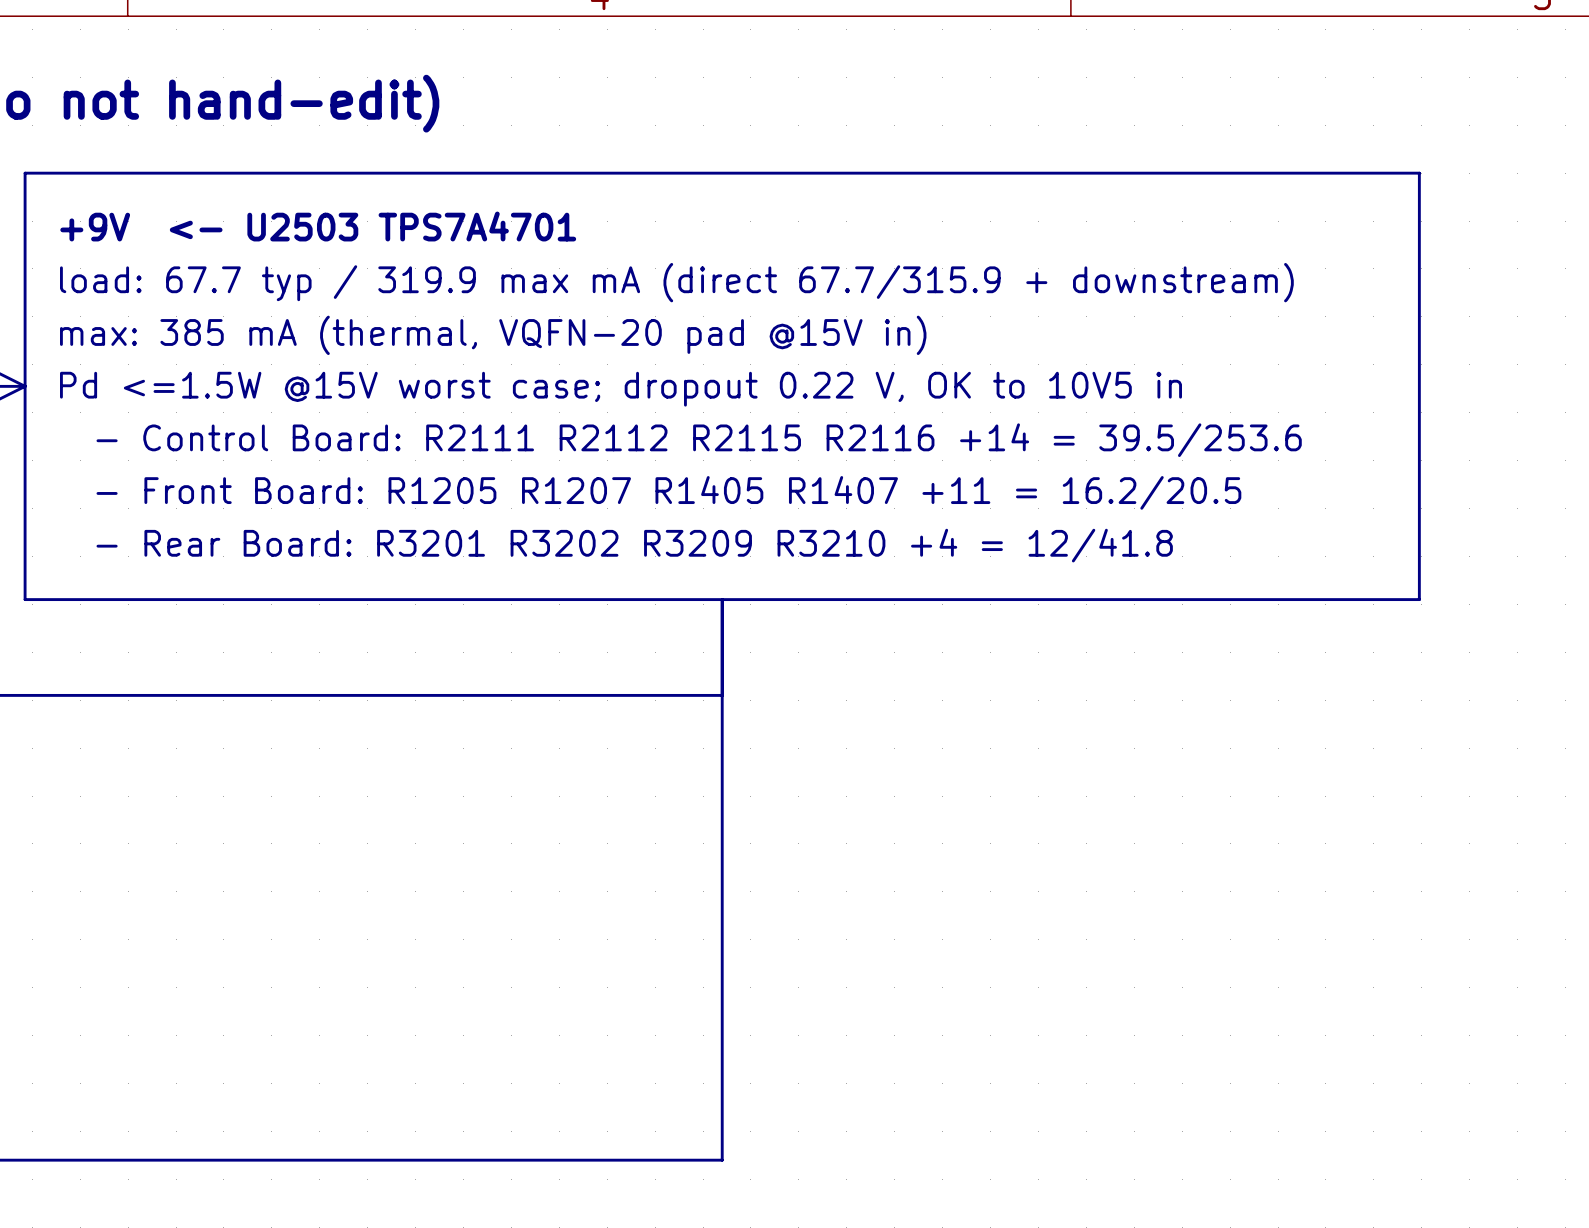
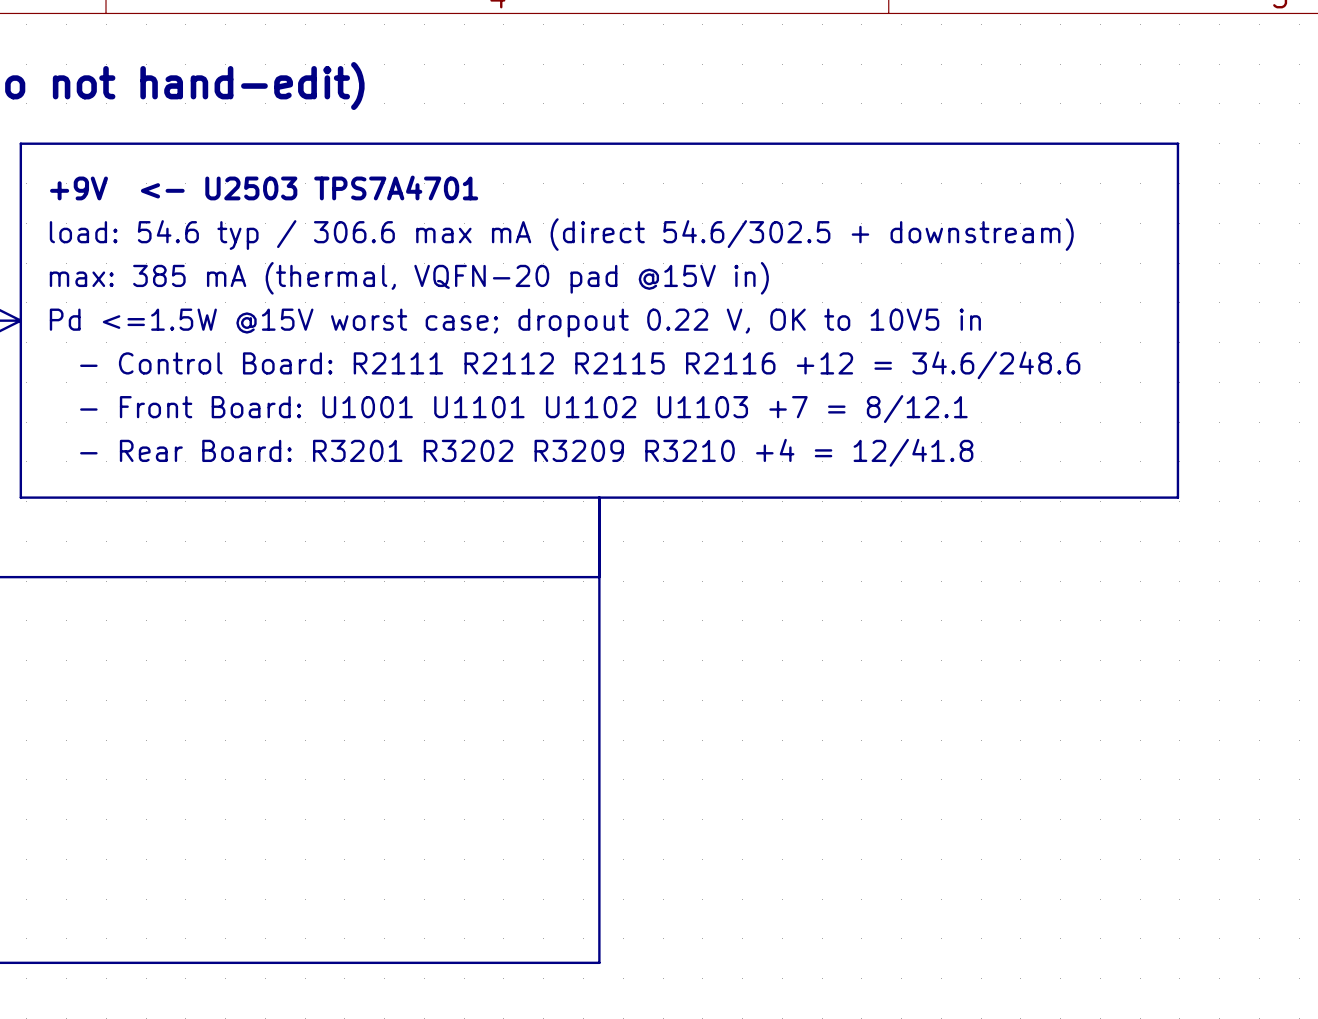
text: load: 67.7 typ / 319.9 max mA (direct 67.7/315.9 + downstream) (676, 282) -> load: 54.6 typ / 306.6 max mA (direct 54.6/302.5 + downstream) (561, 234)
text: - Control Board: R2111 R2112 R2115 R2116 +14 = 39.5/253.6 (699, 440) -> - Control Board: R2111 R2112 R2115 R2116 +12 = 34.6/248.6 (580, 365)
text: - Front Board: R1205 R1207 R1405 R1407 +11 = 16.2/20.5 (668, 492) -> - Front Board: U1001 U1101 U1102 U1103 +7 = 8/12.1 (523, 409)

